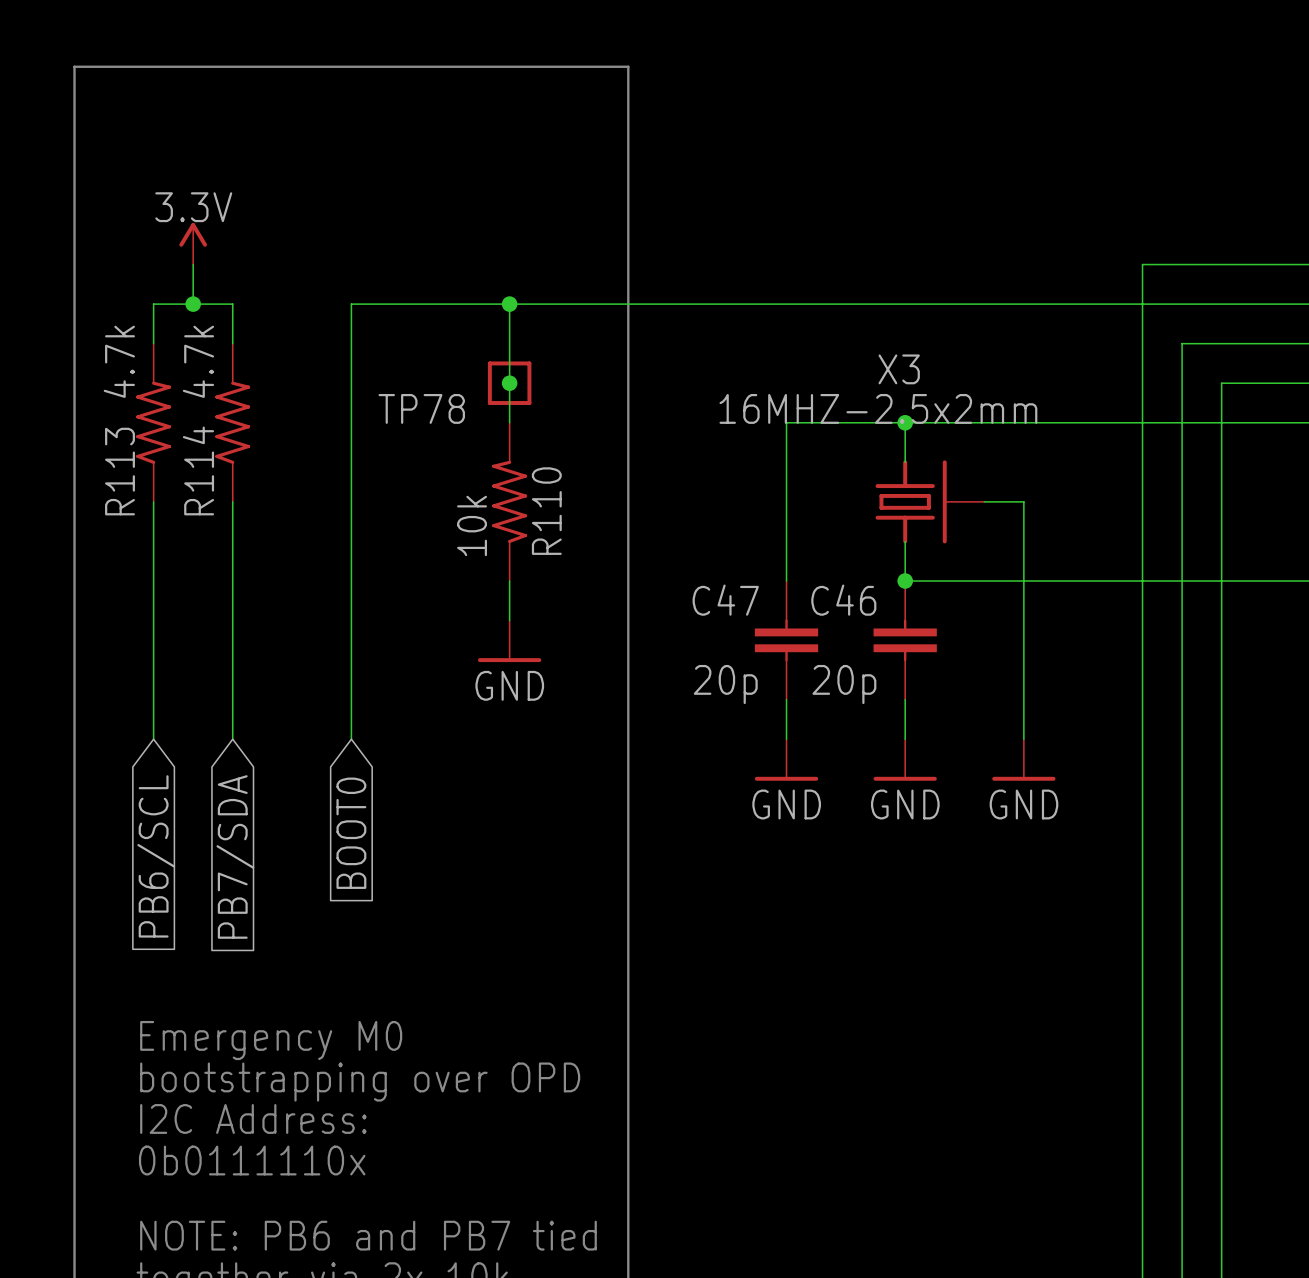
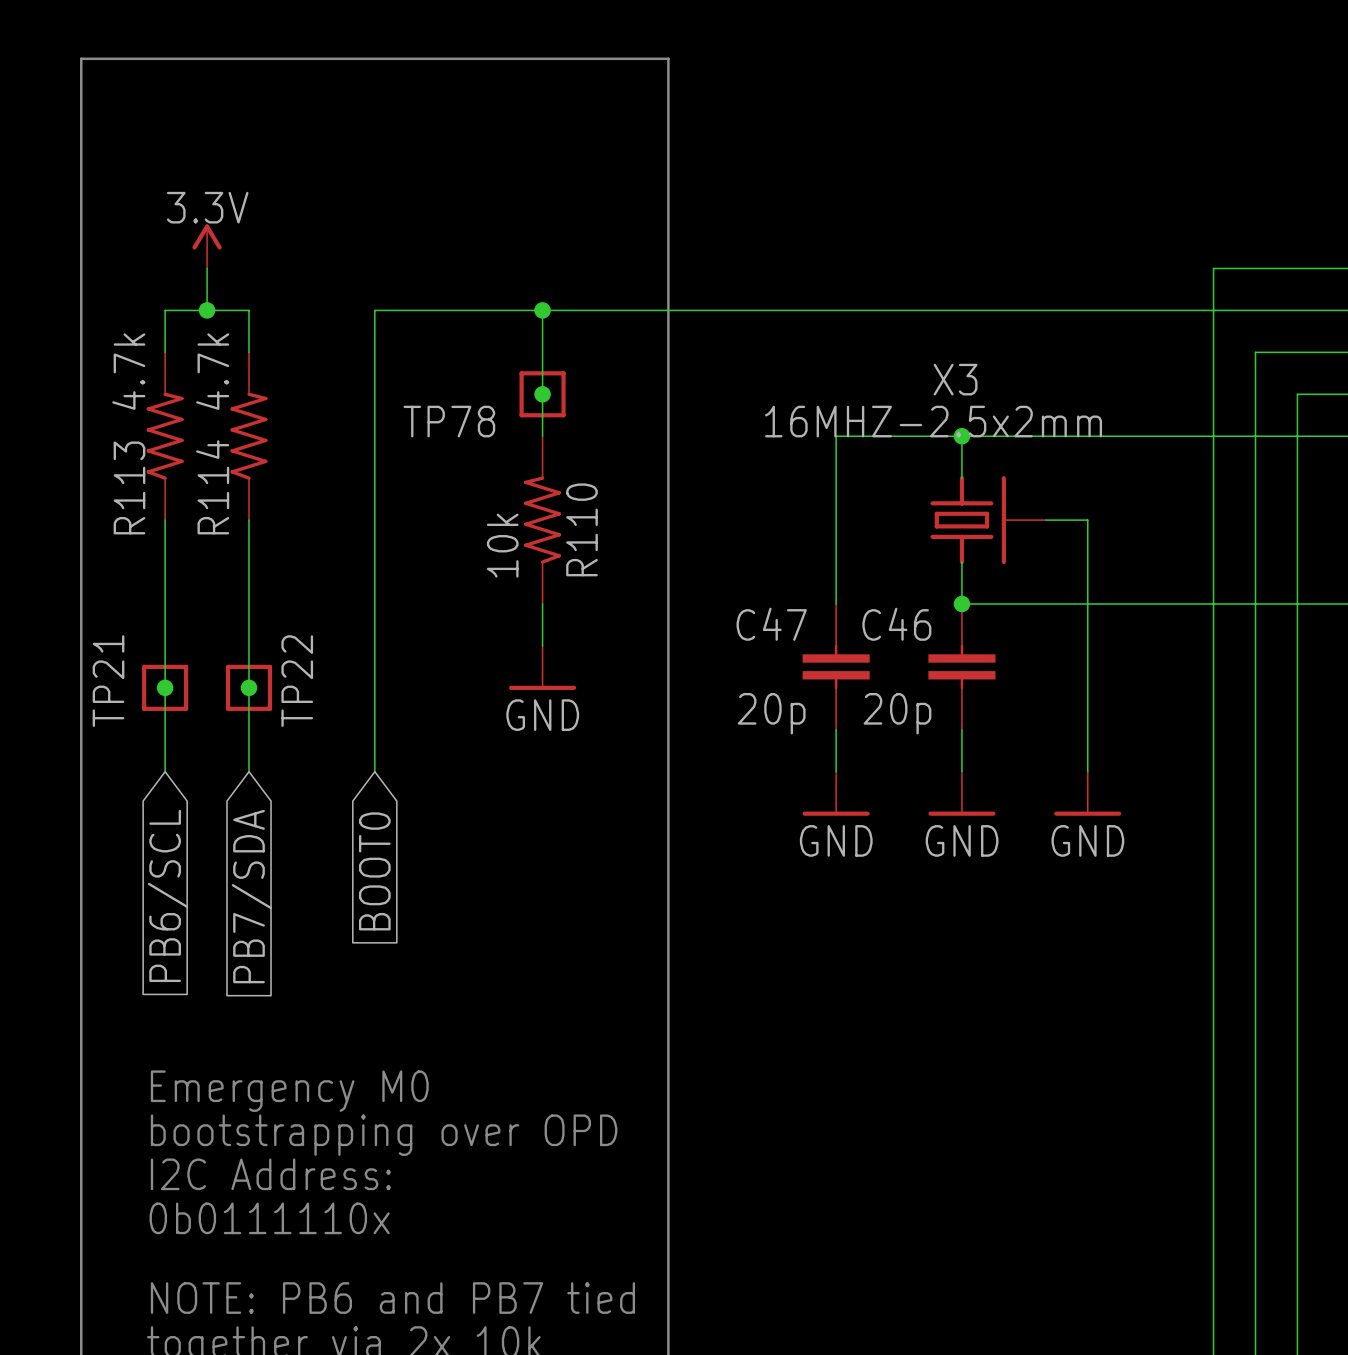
TP21: none -> (165, 687)
junction: none -> (165, 687)
TP22: none -> (249, 687)
junction: none -> (249, 687)

